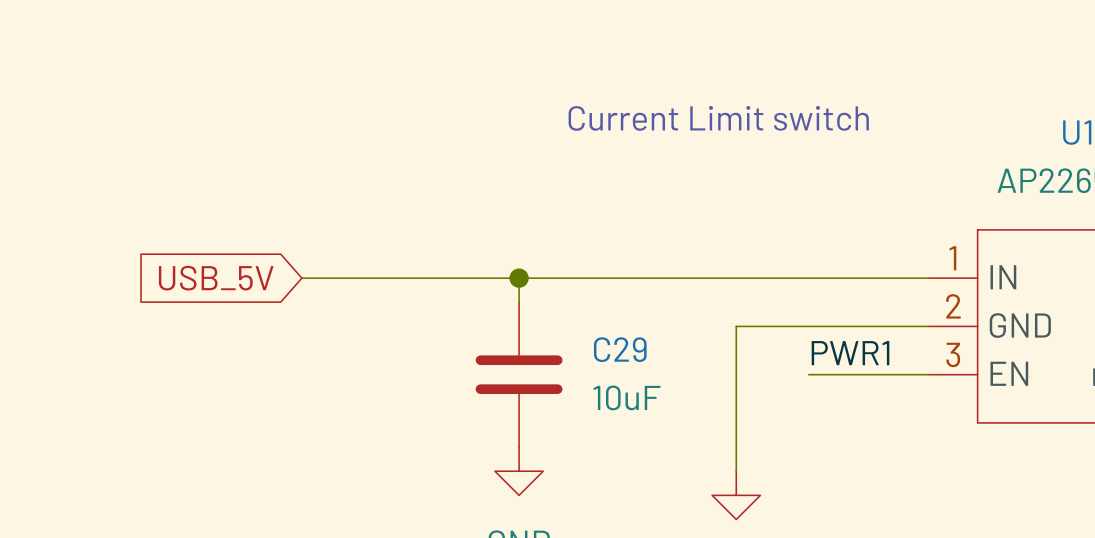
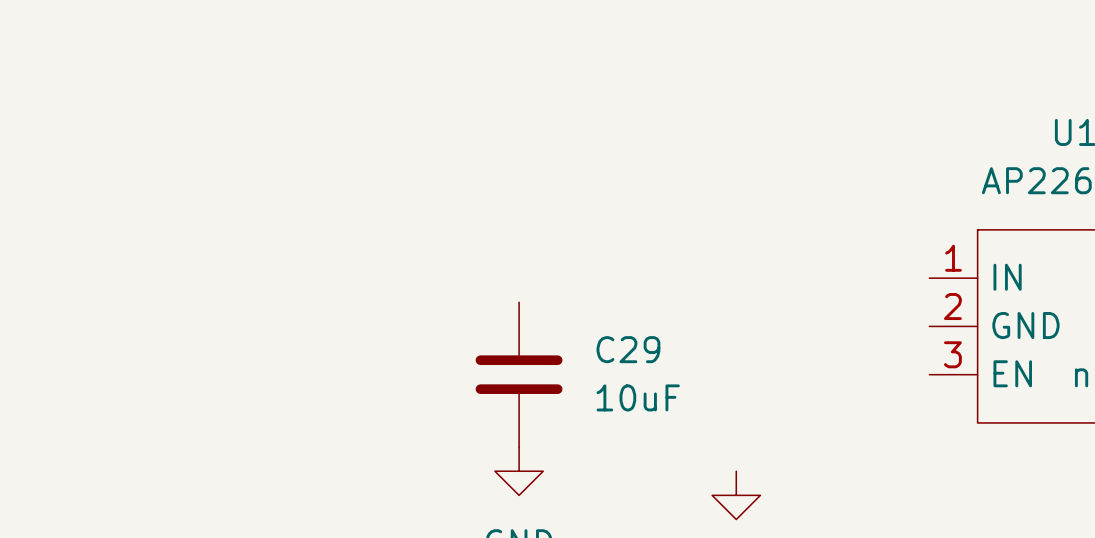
text: Current Limit switch (718, 118) -> none
global label: USB_5V (216, 278) -> none
wire: (301, 278) (929, 278) -> none
wire: (519, 278) (519, 302) -> none
junction: (519, 278) -> none
wire: (929, 326) (736, 326) (736, 471) -> none
label: PWR1 (850, 353) -> none
wire: (808, 374) (929, 374) -> none

